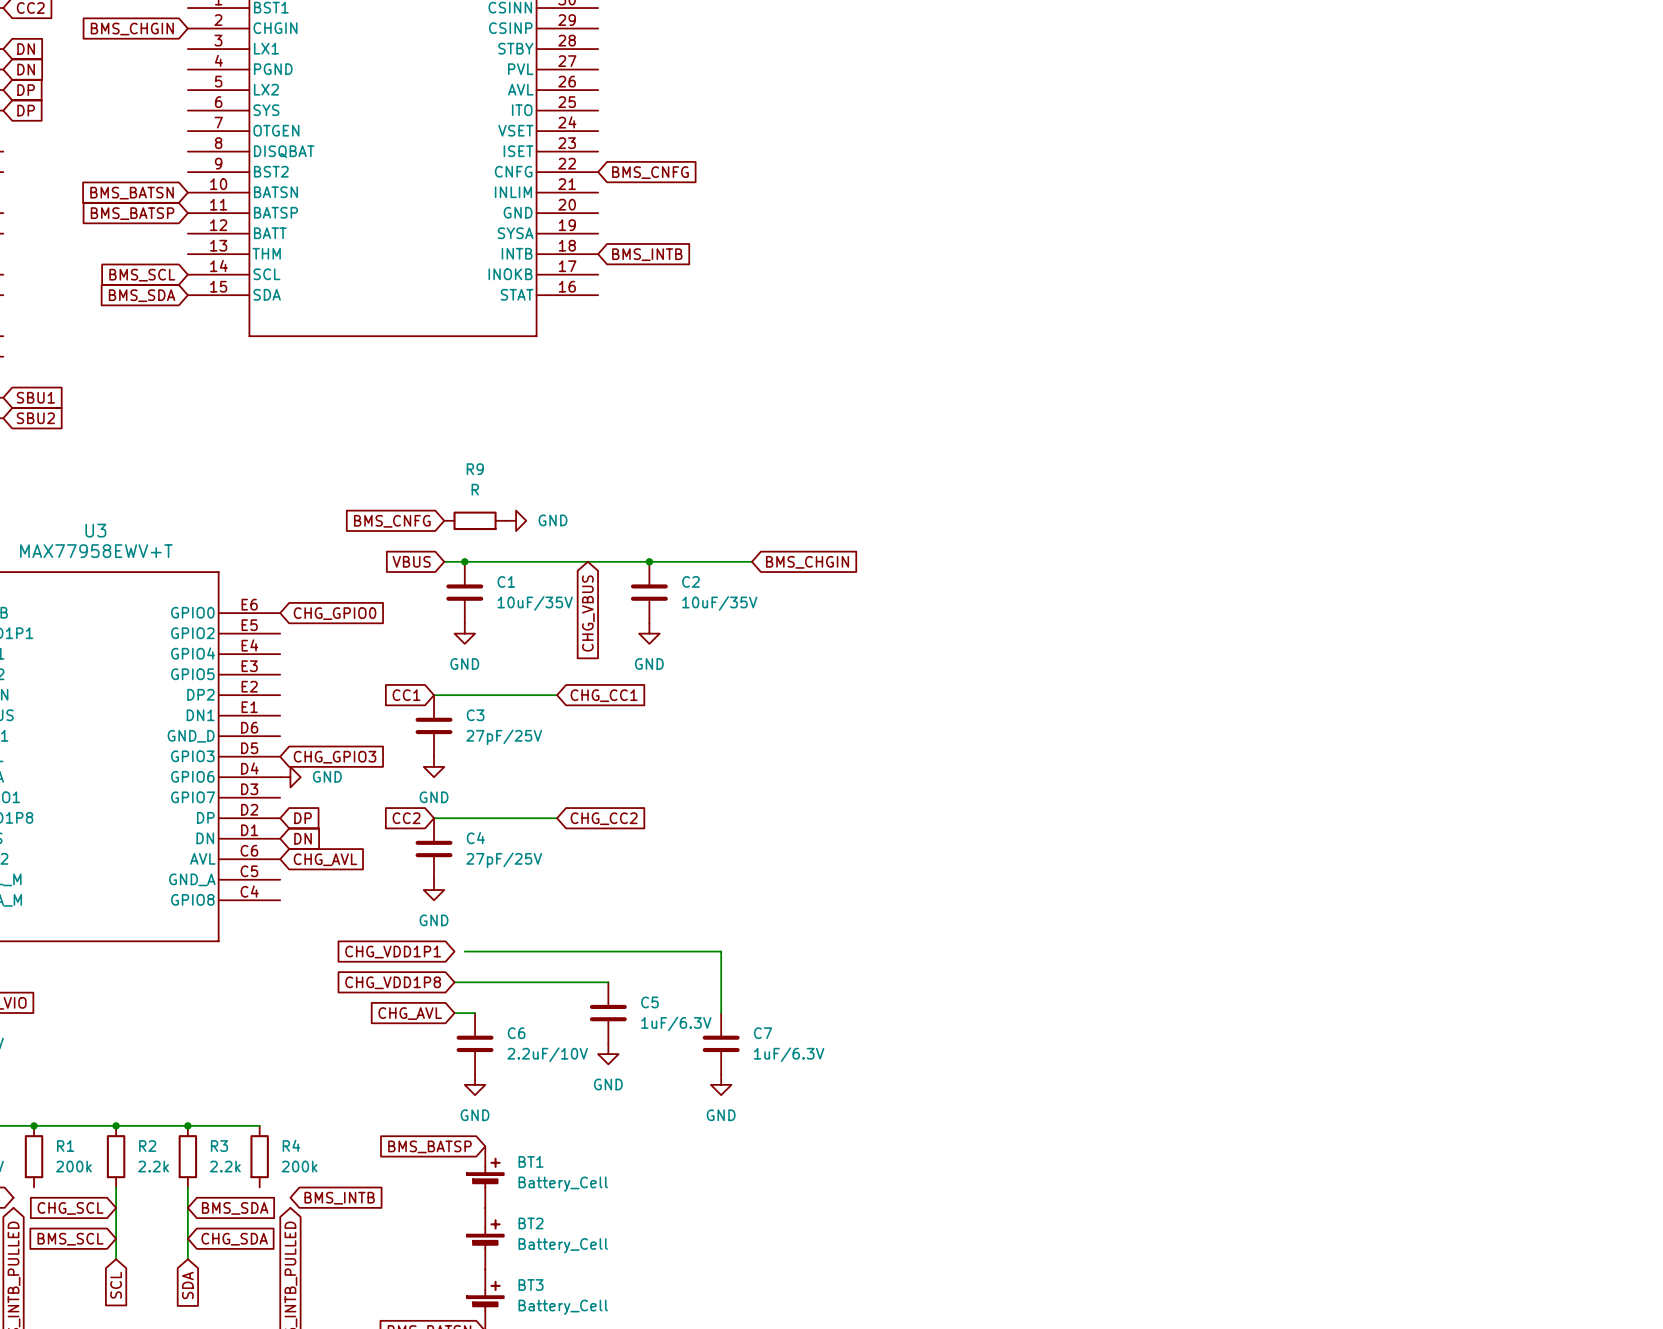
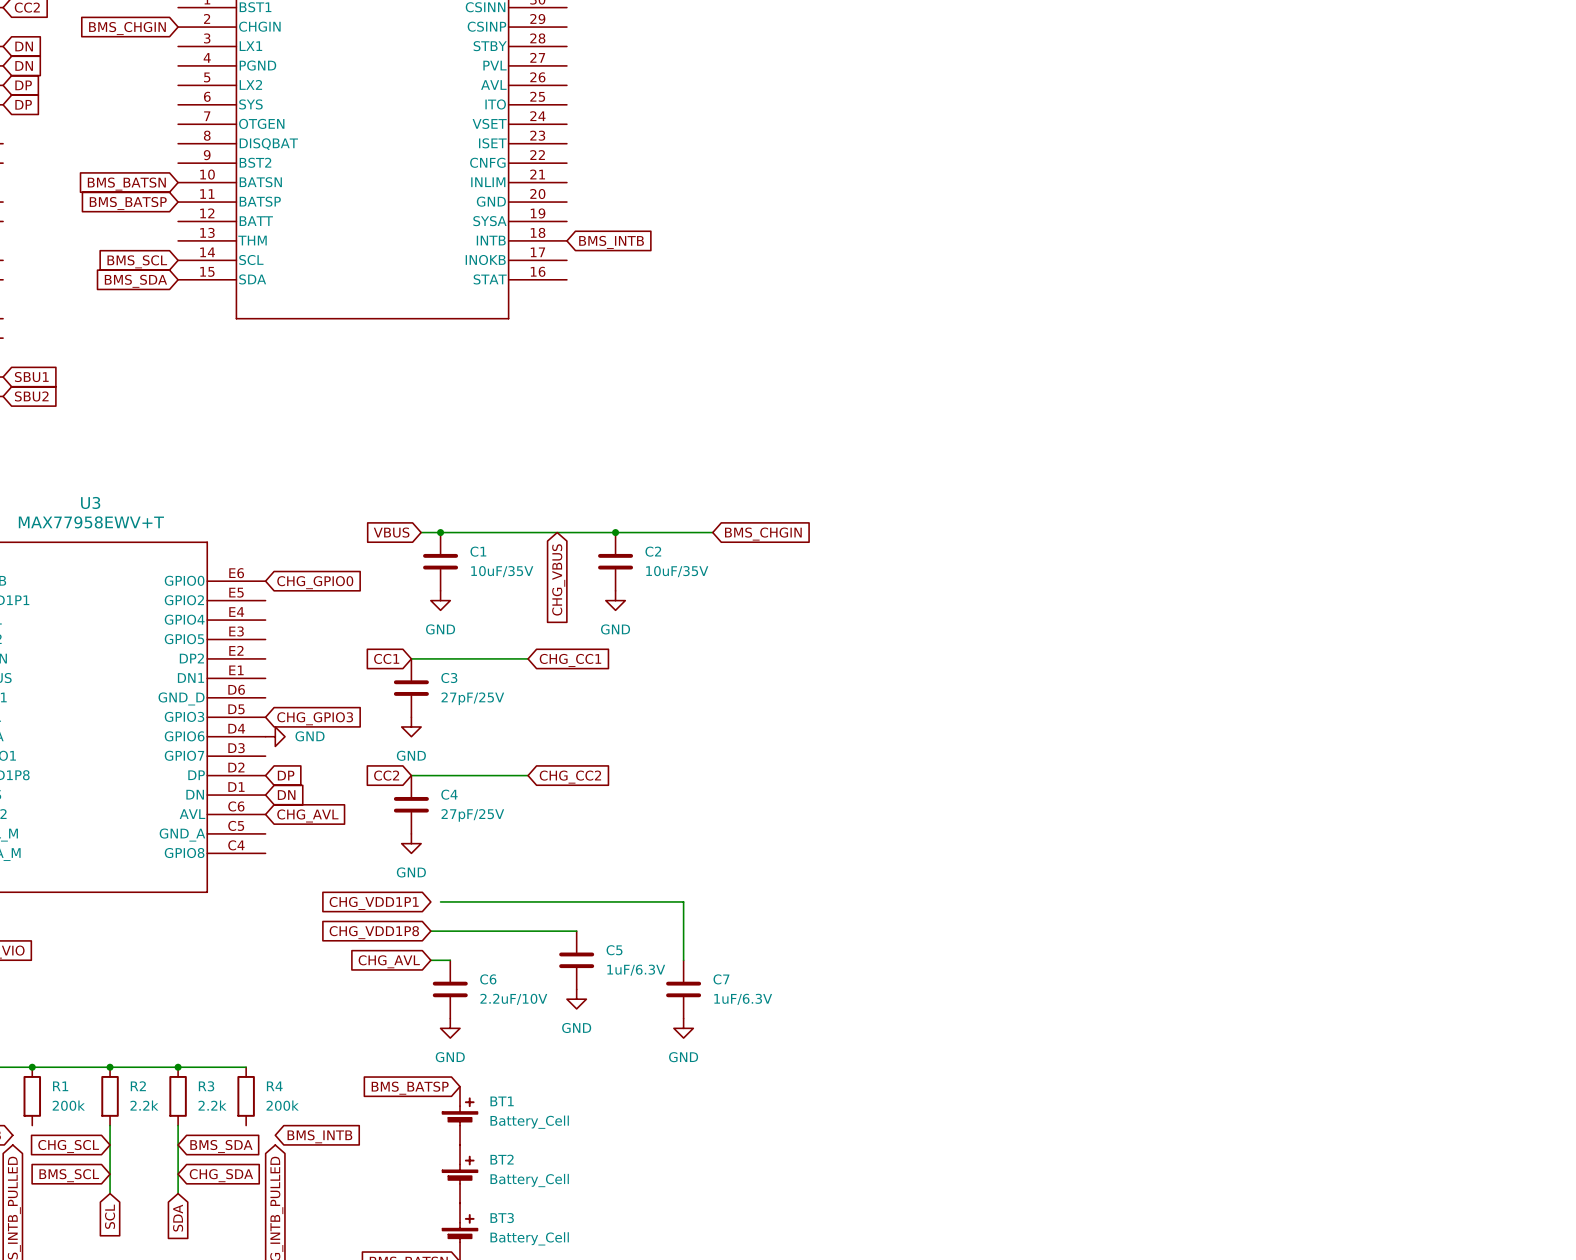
global label: BMS_CNFG (650, 172) -> none
R9: R (475, 520) -> none
power symbol: GND (516, 520) -> none
global label: BMS_CNFG (392, 521) -> none

